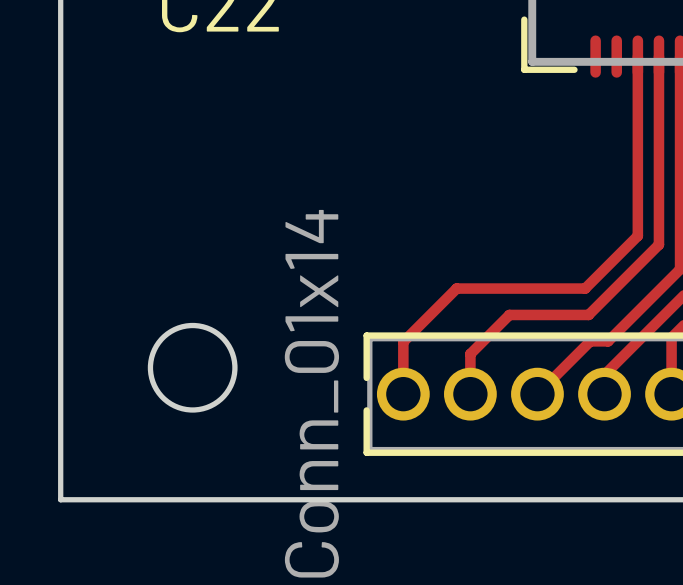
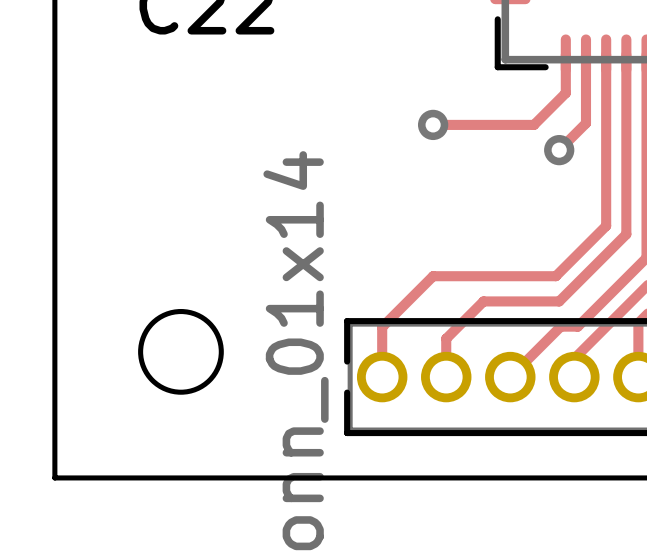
track: none -> (565, 54) (565, 93) (533, 124) (433, 124)
track: none -> (586, 54) (586, 123) (559, 150)
via: none -> (433, 124)
via: none -> (559, 150)

